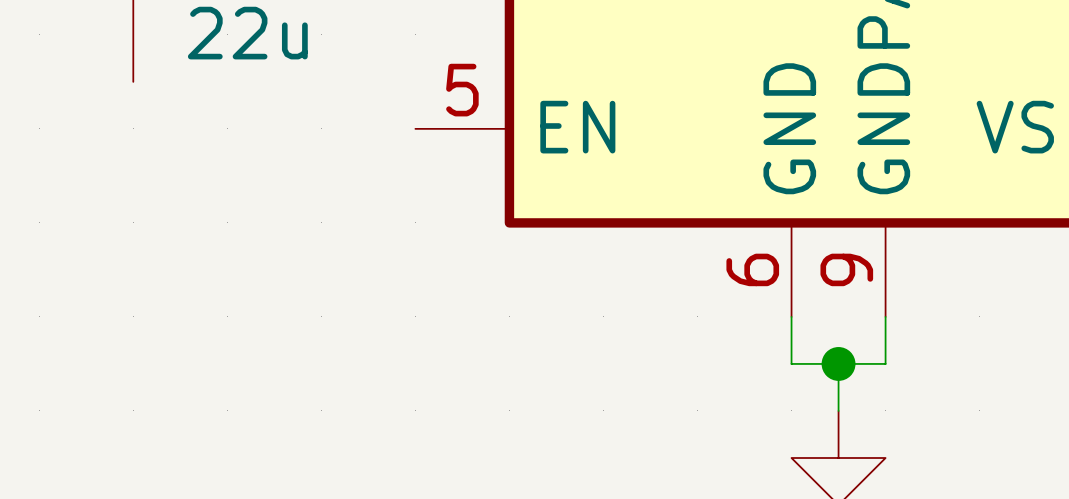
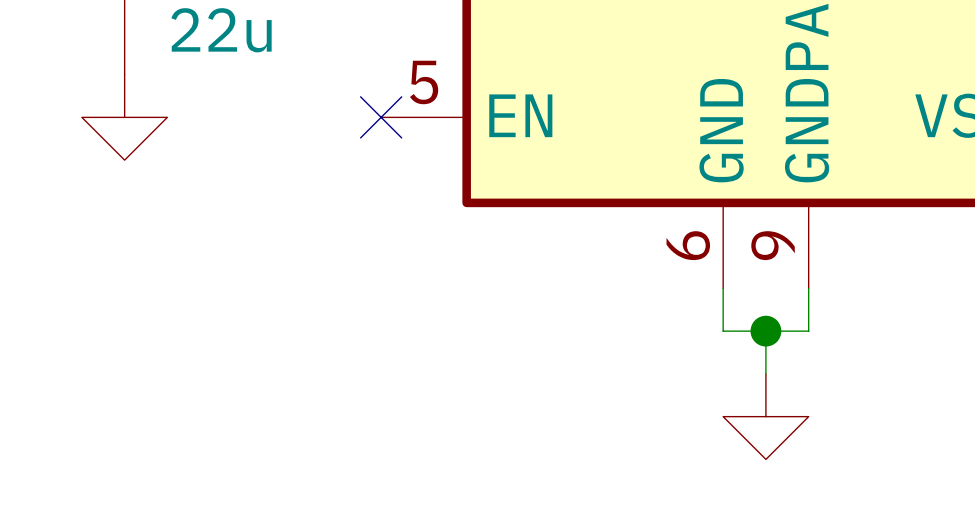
power symbol: none -> (124, 117)
no-connect mark: none -> (381, 117)

